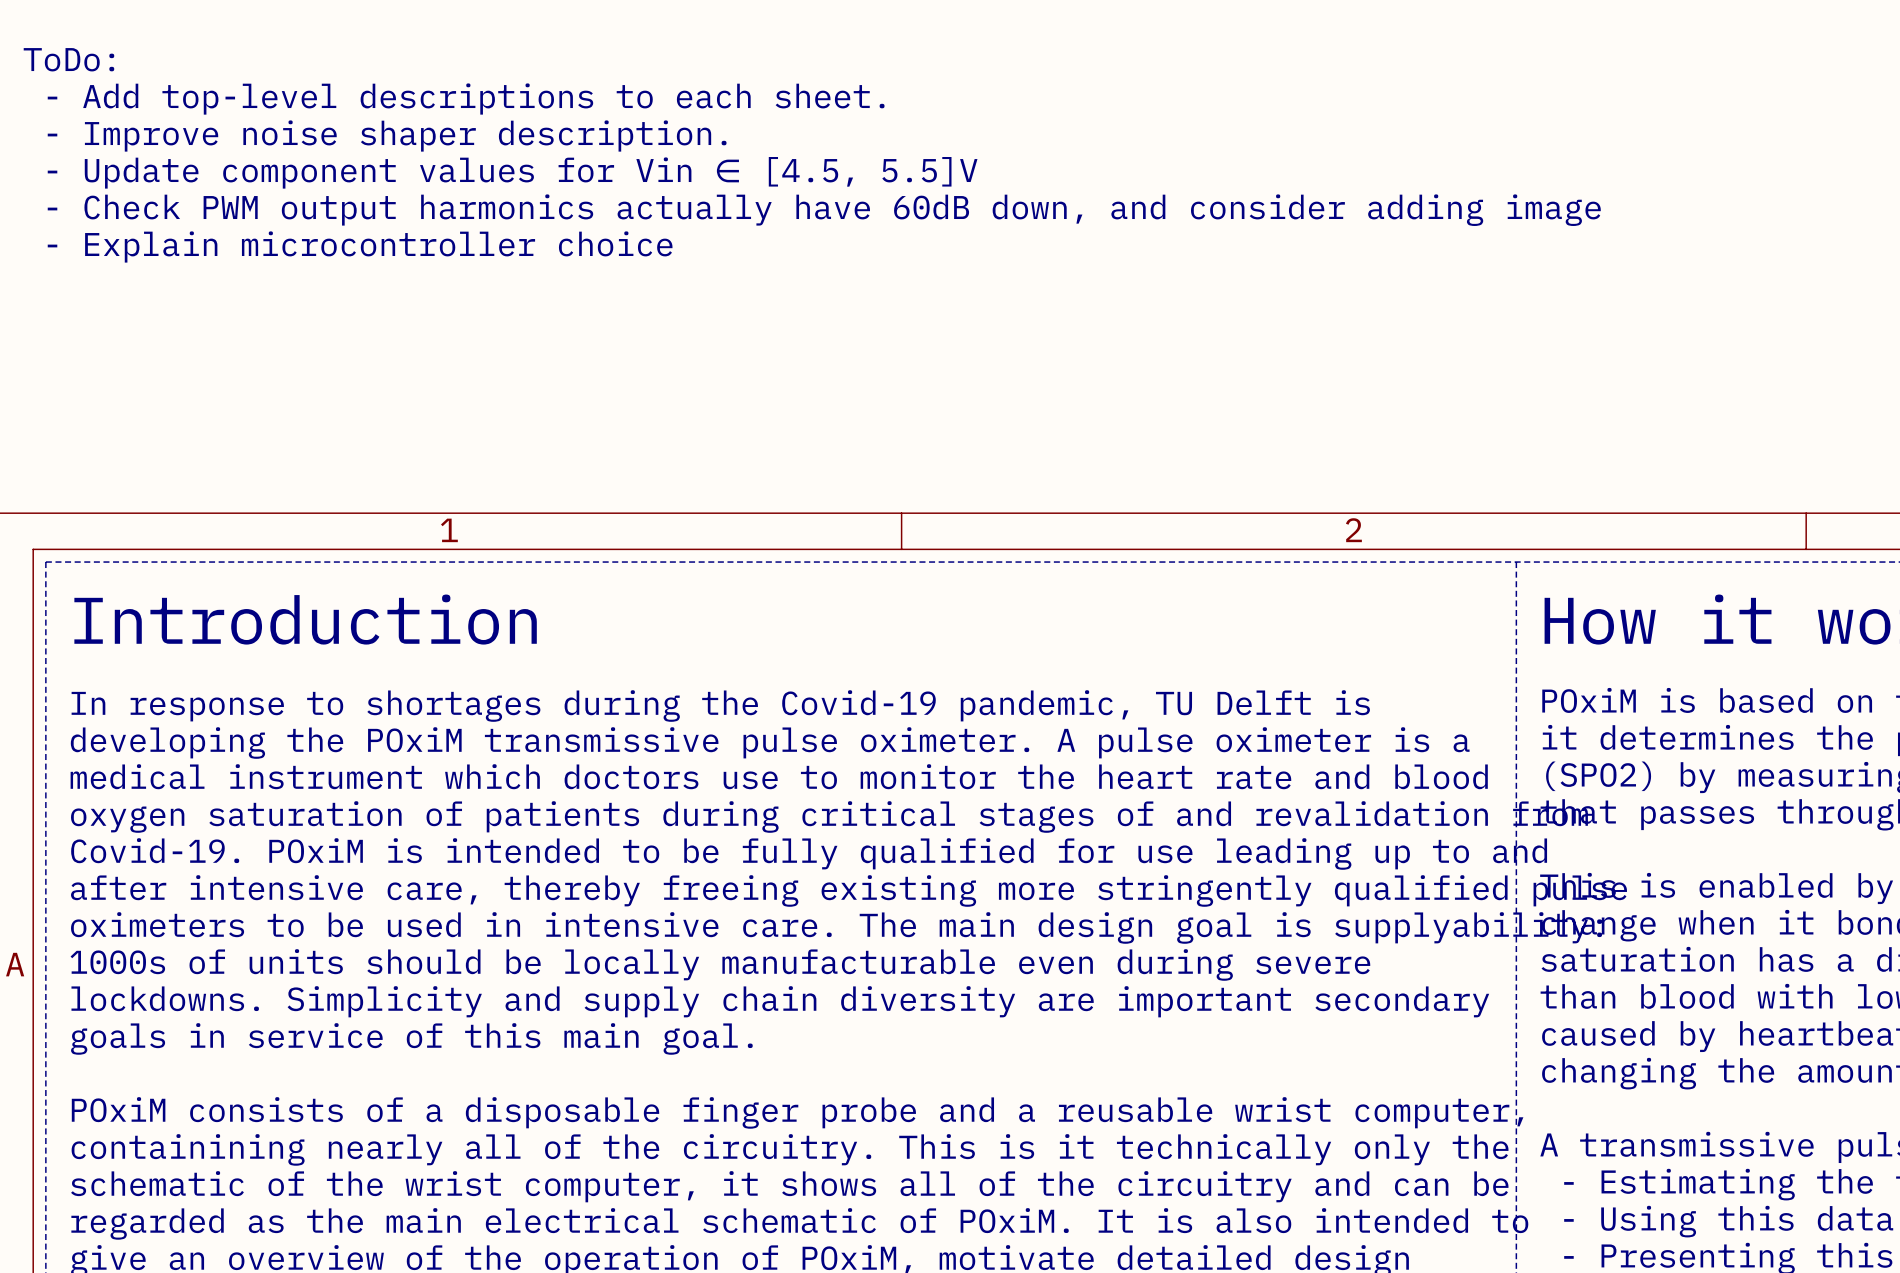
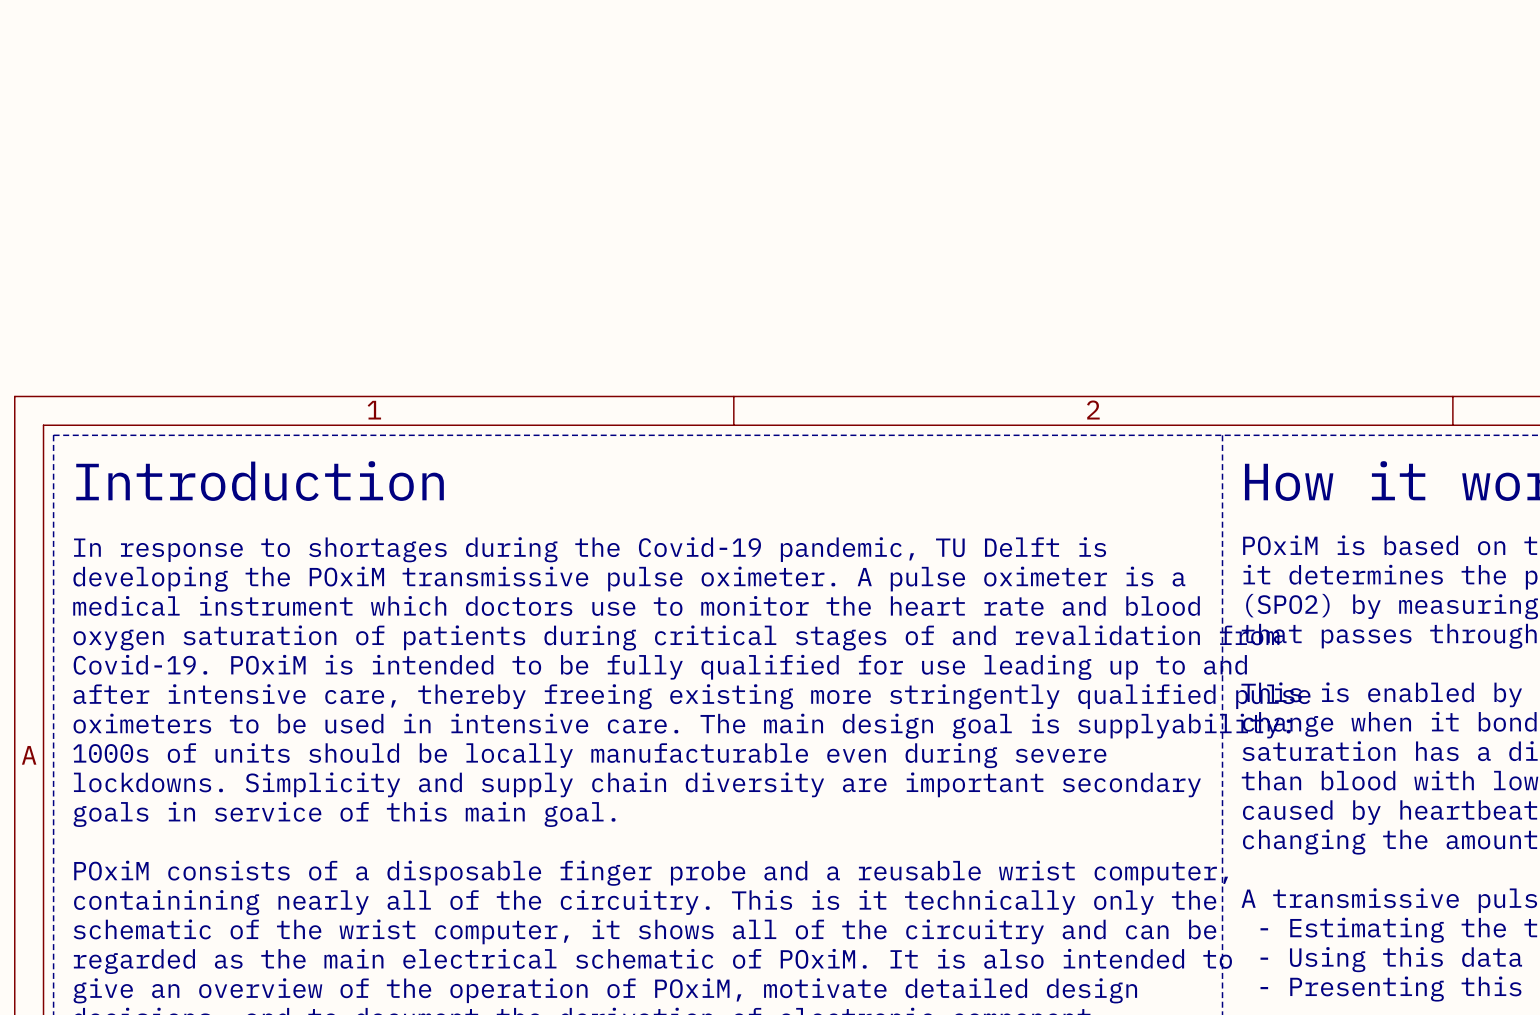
text: ToDo: (68, 59) -> none
text: - Add top-level descriptions to each sheet. (466, 99) -> none
text: - Improve noise shaper description. (387, 136) -> none
text: - Update component values for Vin ∈ [4.5, 5.5]V (512, 172) -> none
text: - Check PWM output harmonics actually have 60dB down, and consider adding image (824, 210) -> none
text: - Explain microcontroller choice (360, 246) -> none

